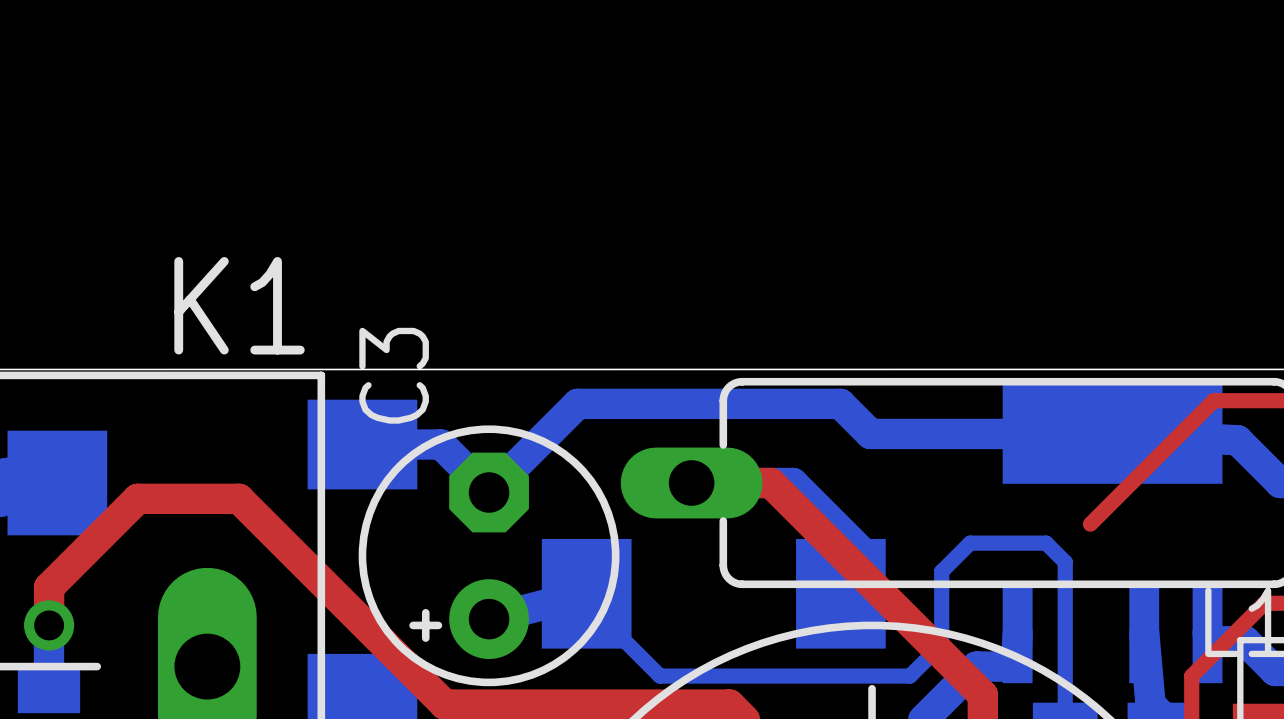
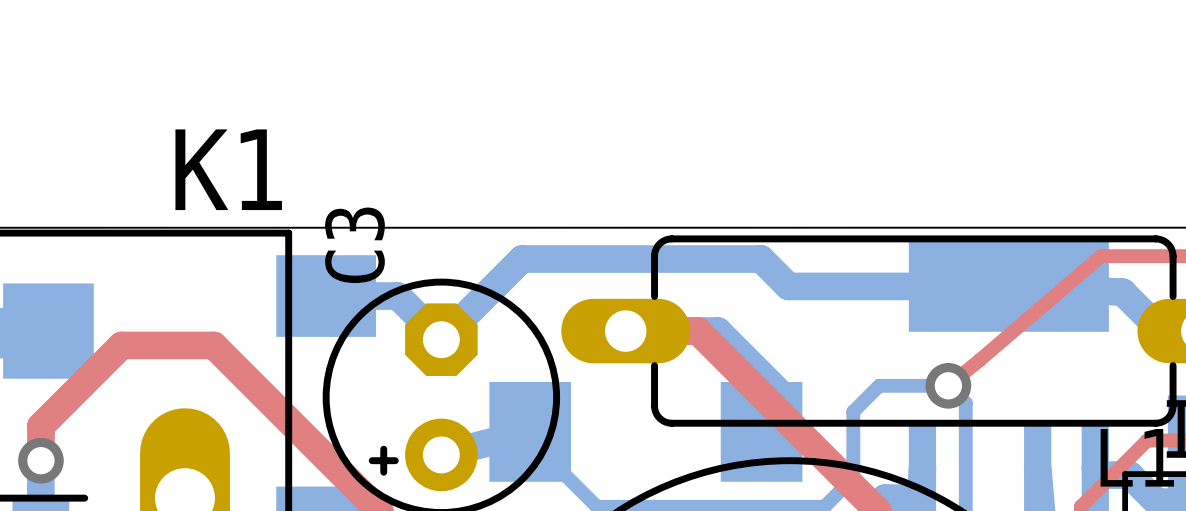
top track: (1213, 400) (1090, 524) -> (1101, 256) (948, 385)
via: none -> (948, 385)

